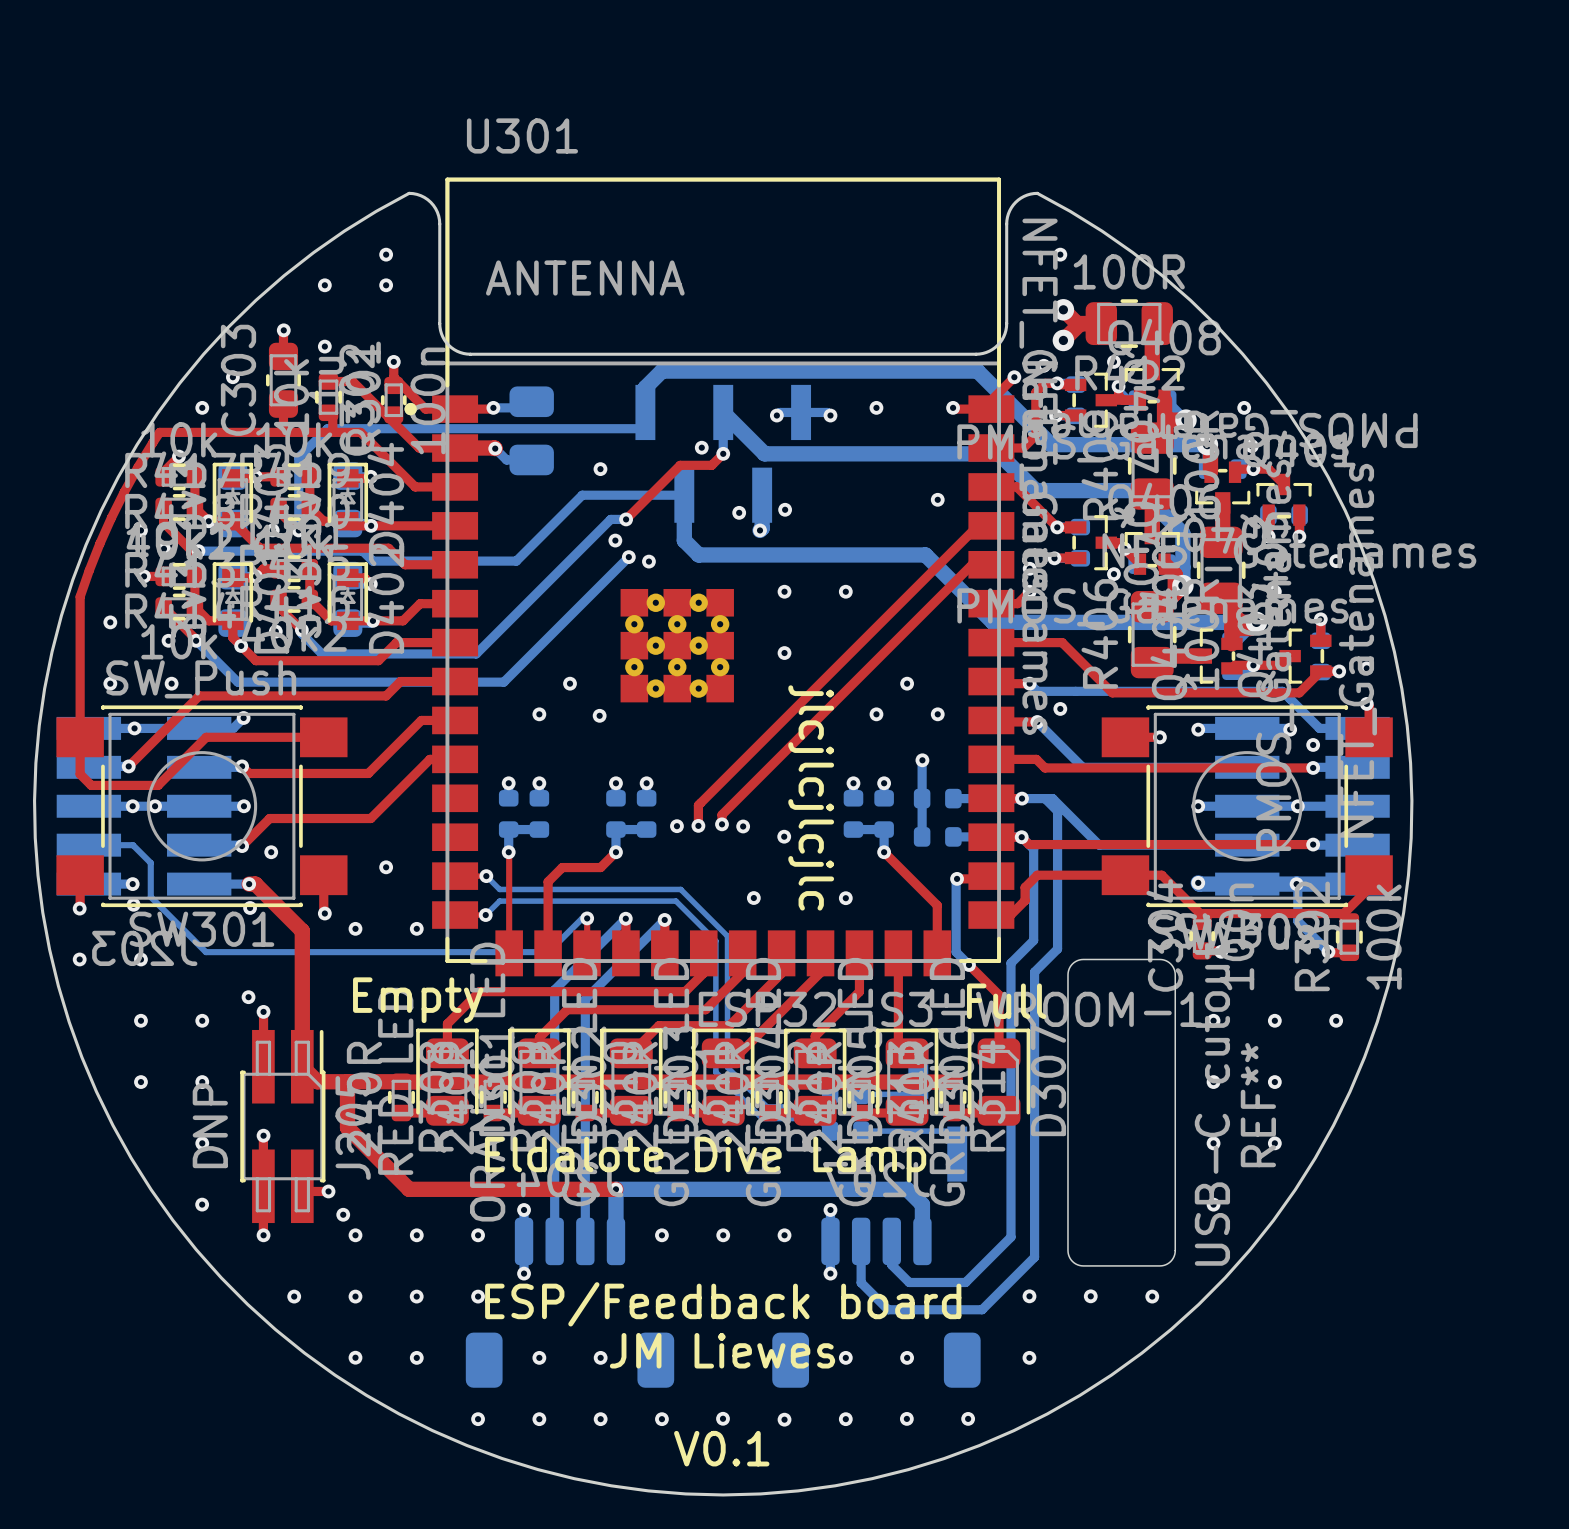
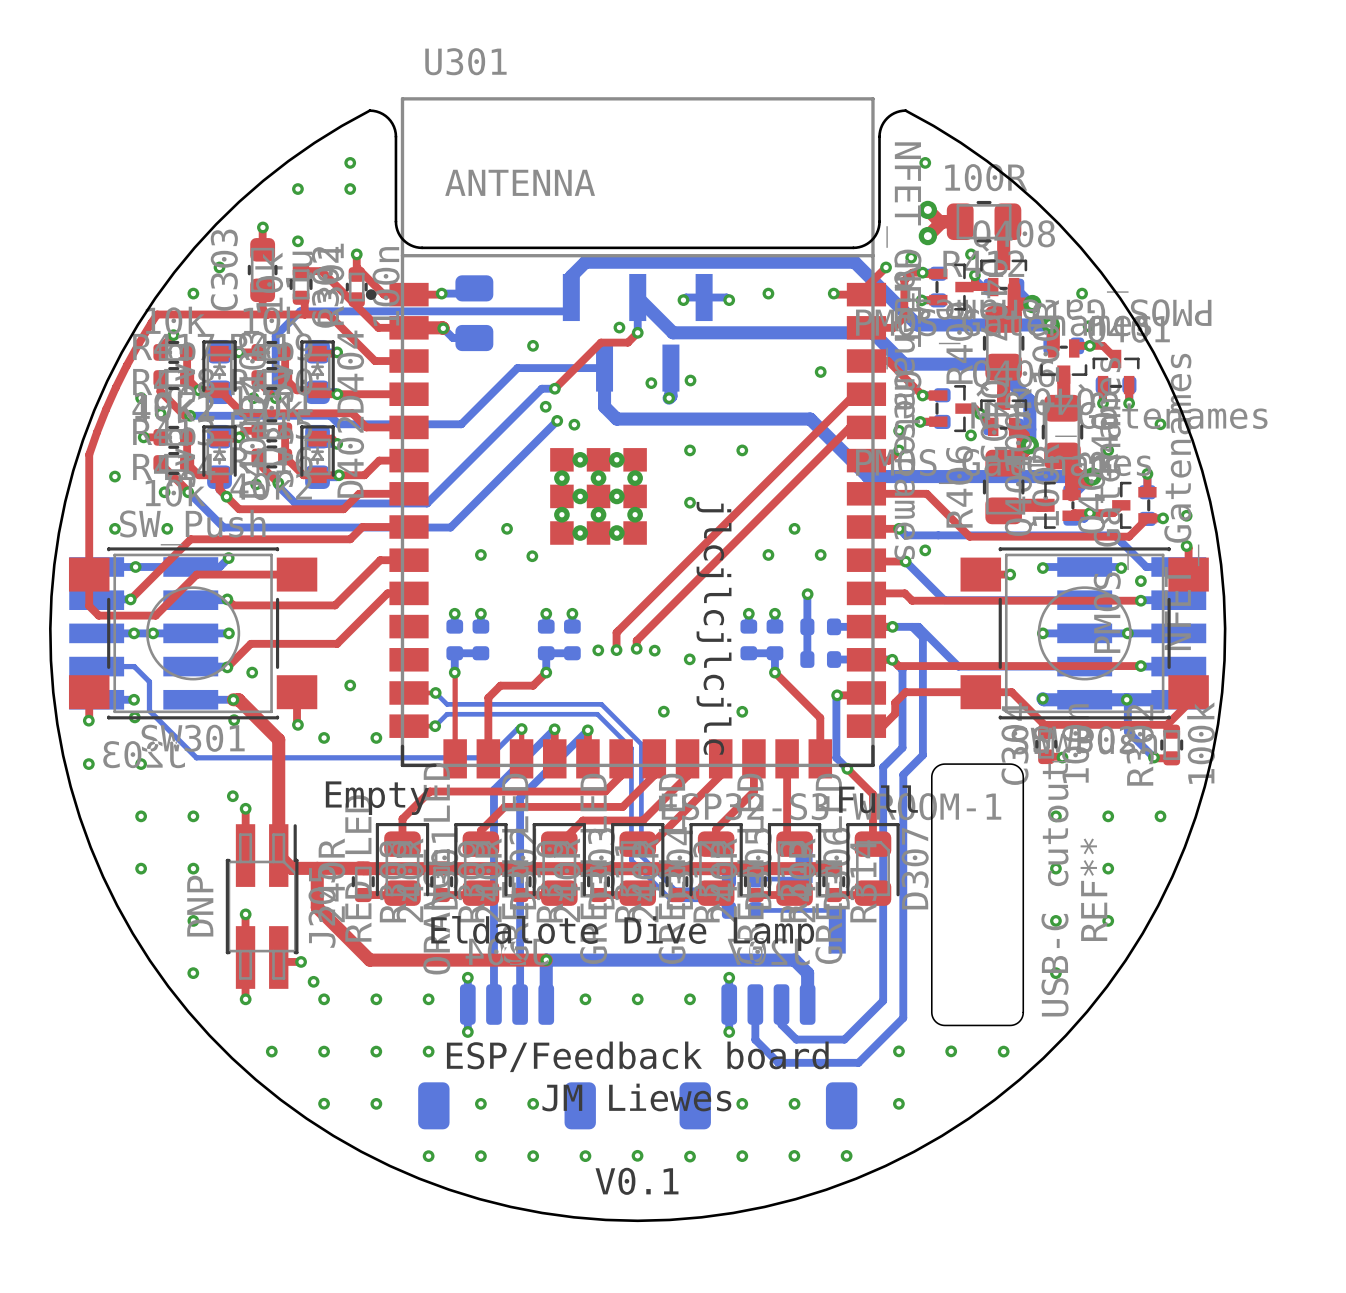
U301 footprint: [404, 177, 1015, 977] -> [365, 97, 887, 779]

